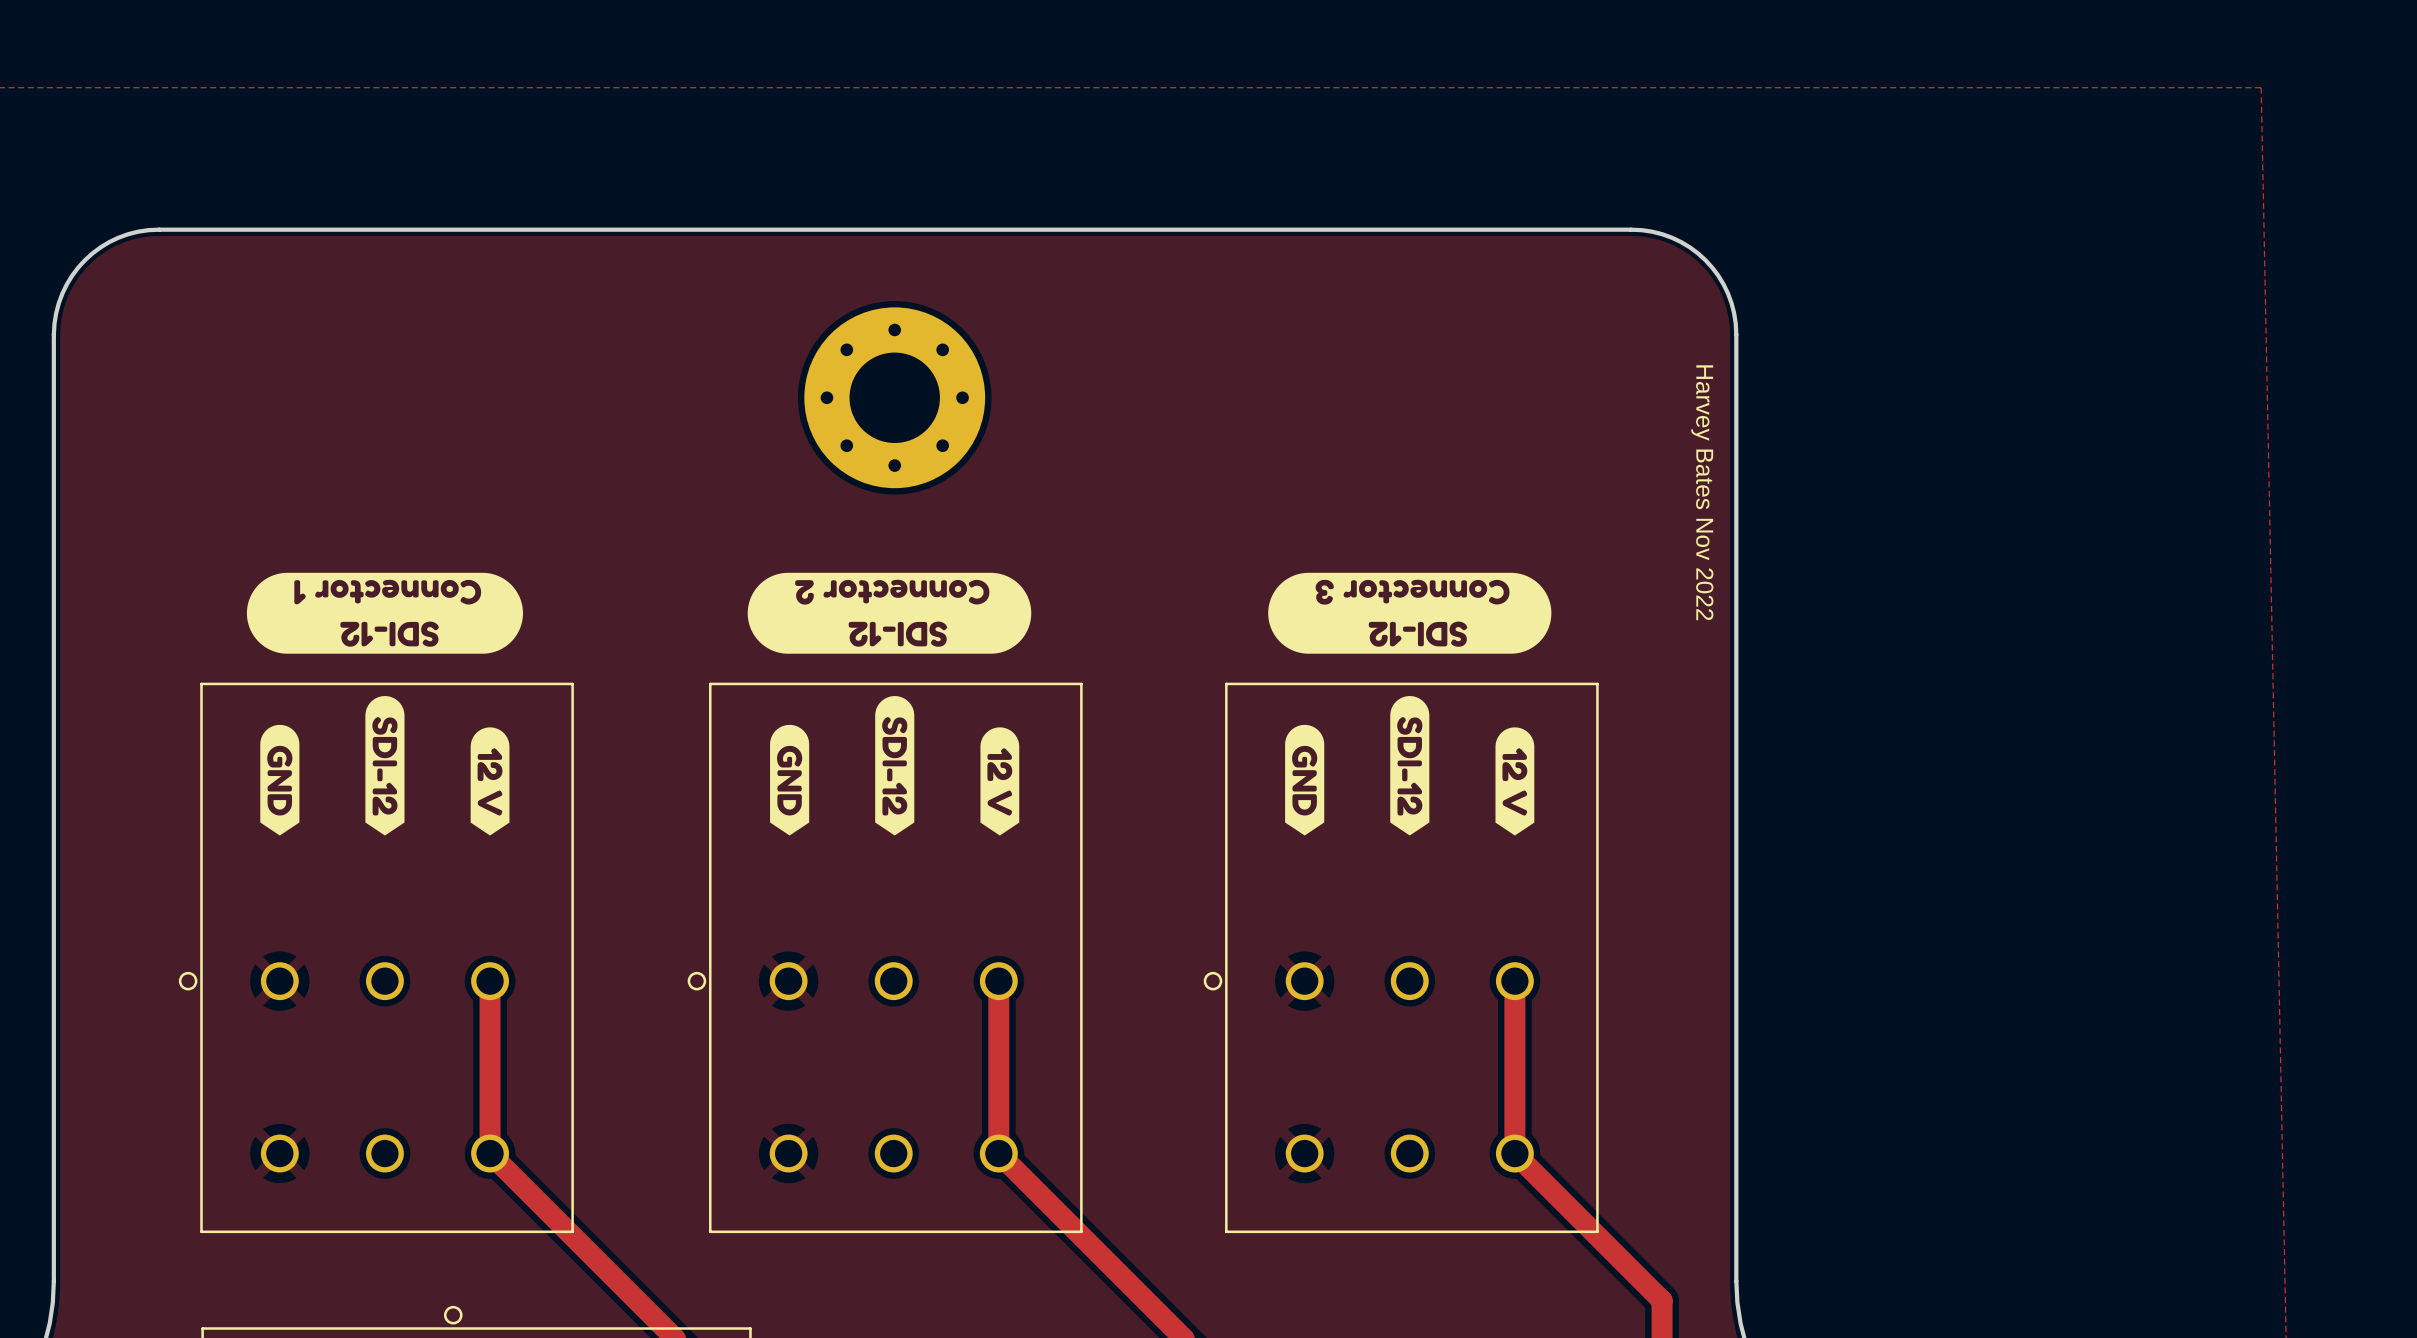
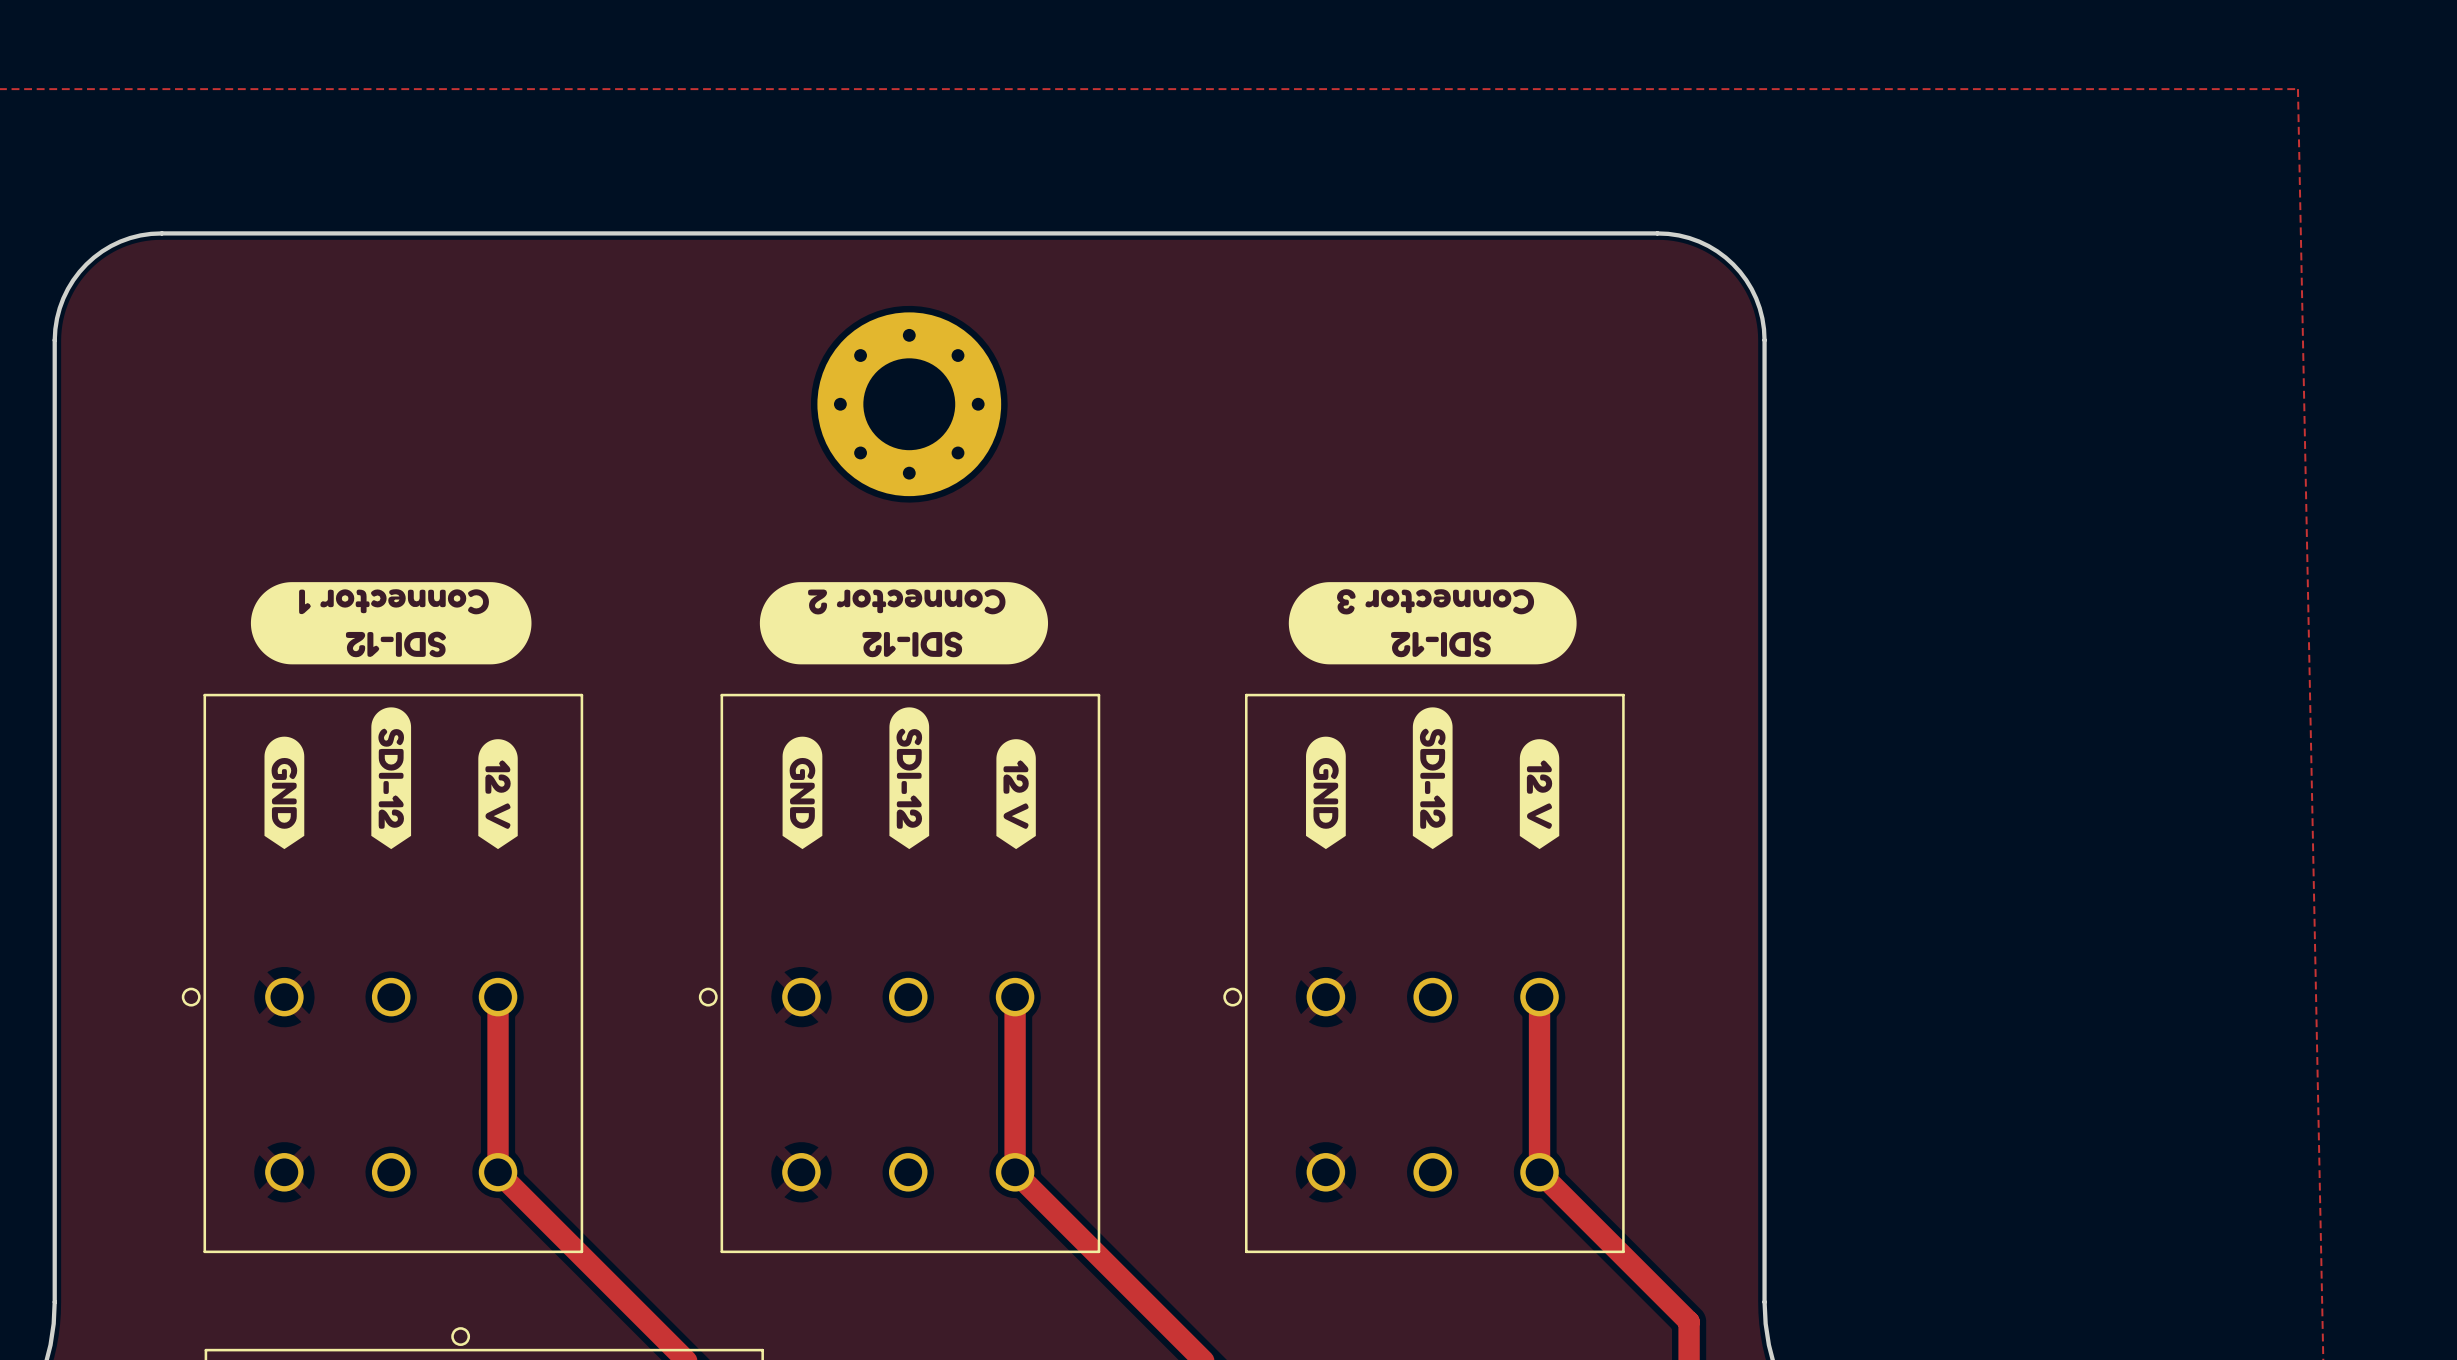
text: Harvey Bates Nov 2022 (1702, 492) -> none

